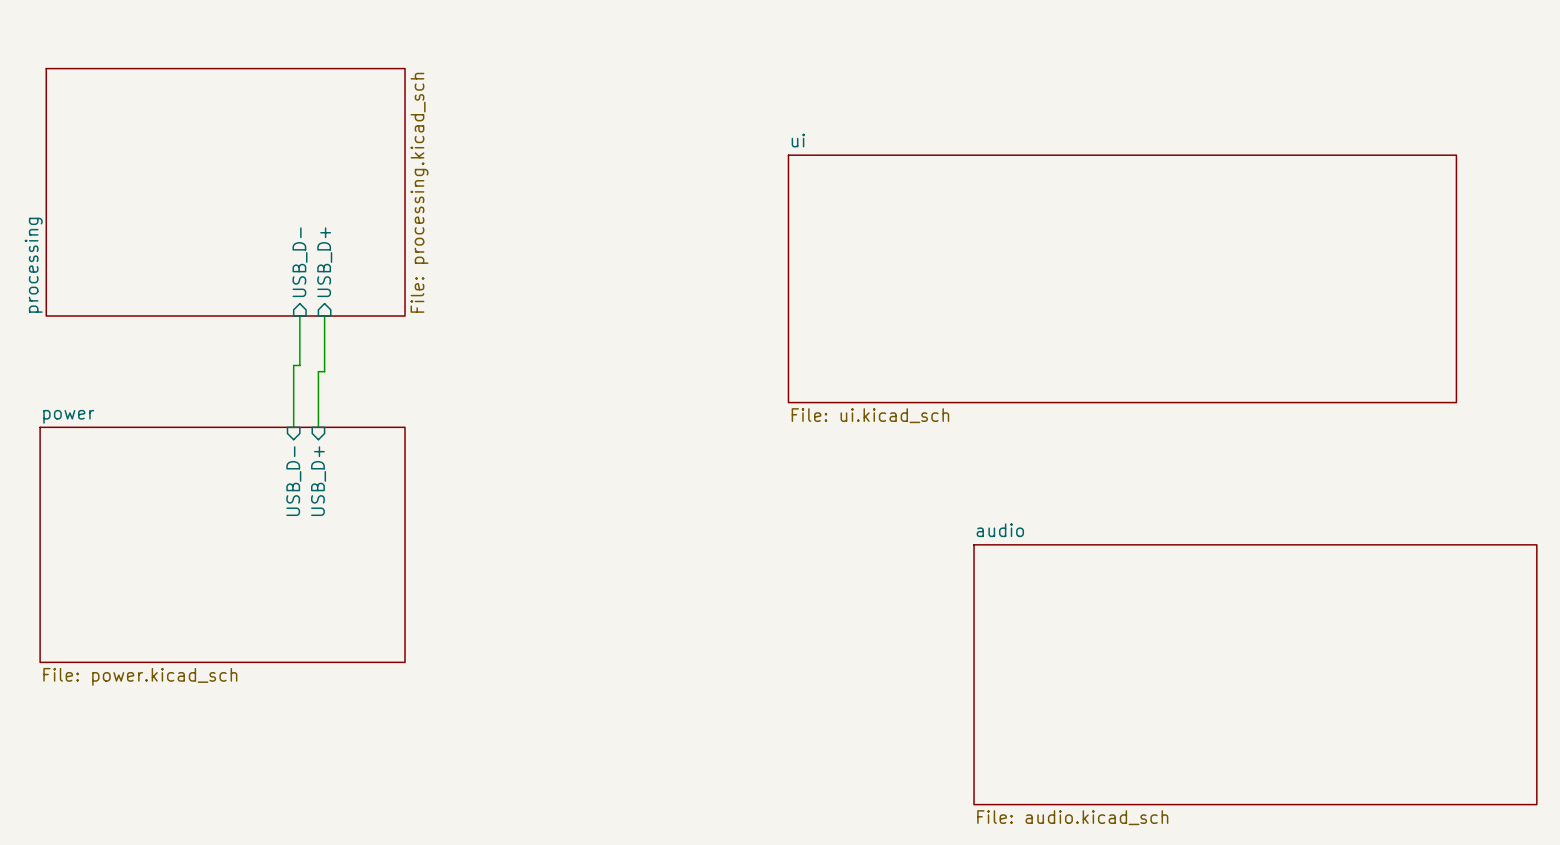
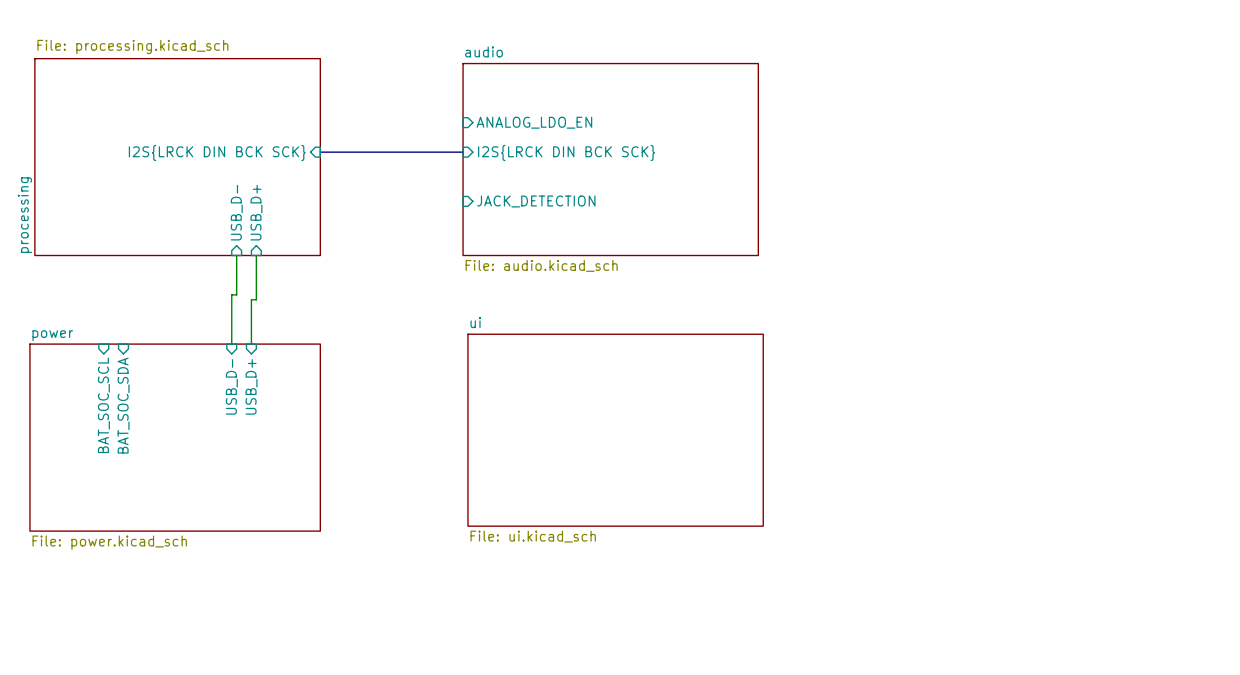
sheet pin: none -> ANALOG_LDO_EN (534, 122)
bus: none -> (320, 152) (463, 152)
sheet pin: none -> I2S{LRCK DIN BCK SCK} (217, 152)
sheet pin: none -> I2S{LRCK DIN BCK SCK} (566, 152)
sheet processing value rotation: 0° (419, 192) -> 90° clockwise (132, 46)
sheet audio: none -> File: audio.kicad_sch (610, 159)
sheet pin: none -> JACK_DETECTION (536, 201)
sheet ui: File: ui.kicad_sch (1122, 278) -> none
sheet pin: none -> BAT_SOC_SCL (103, 405)
sheet pin: none -> BAT_SOC_SDA (123, 405)
sheet ui: none -> File: ui.kicad_sch (615, 430)
sheet audio: File: audio.kicad_sch (1255, 674) -> none

